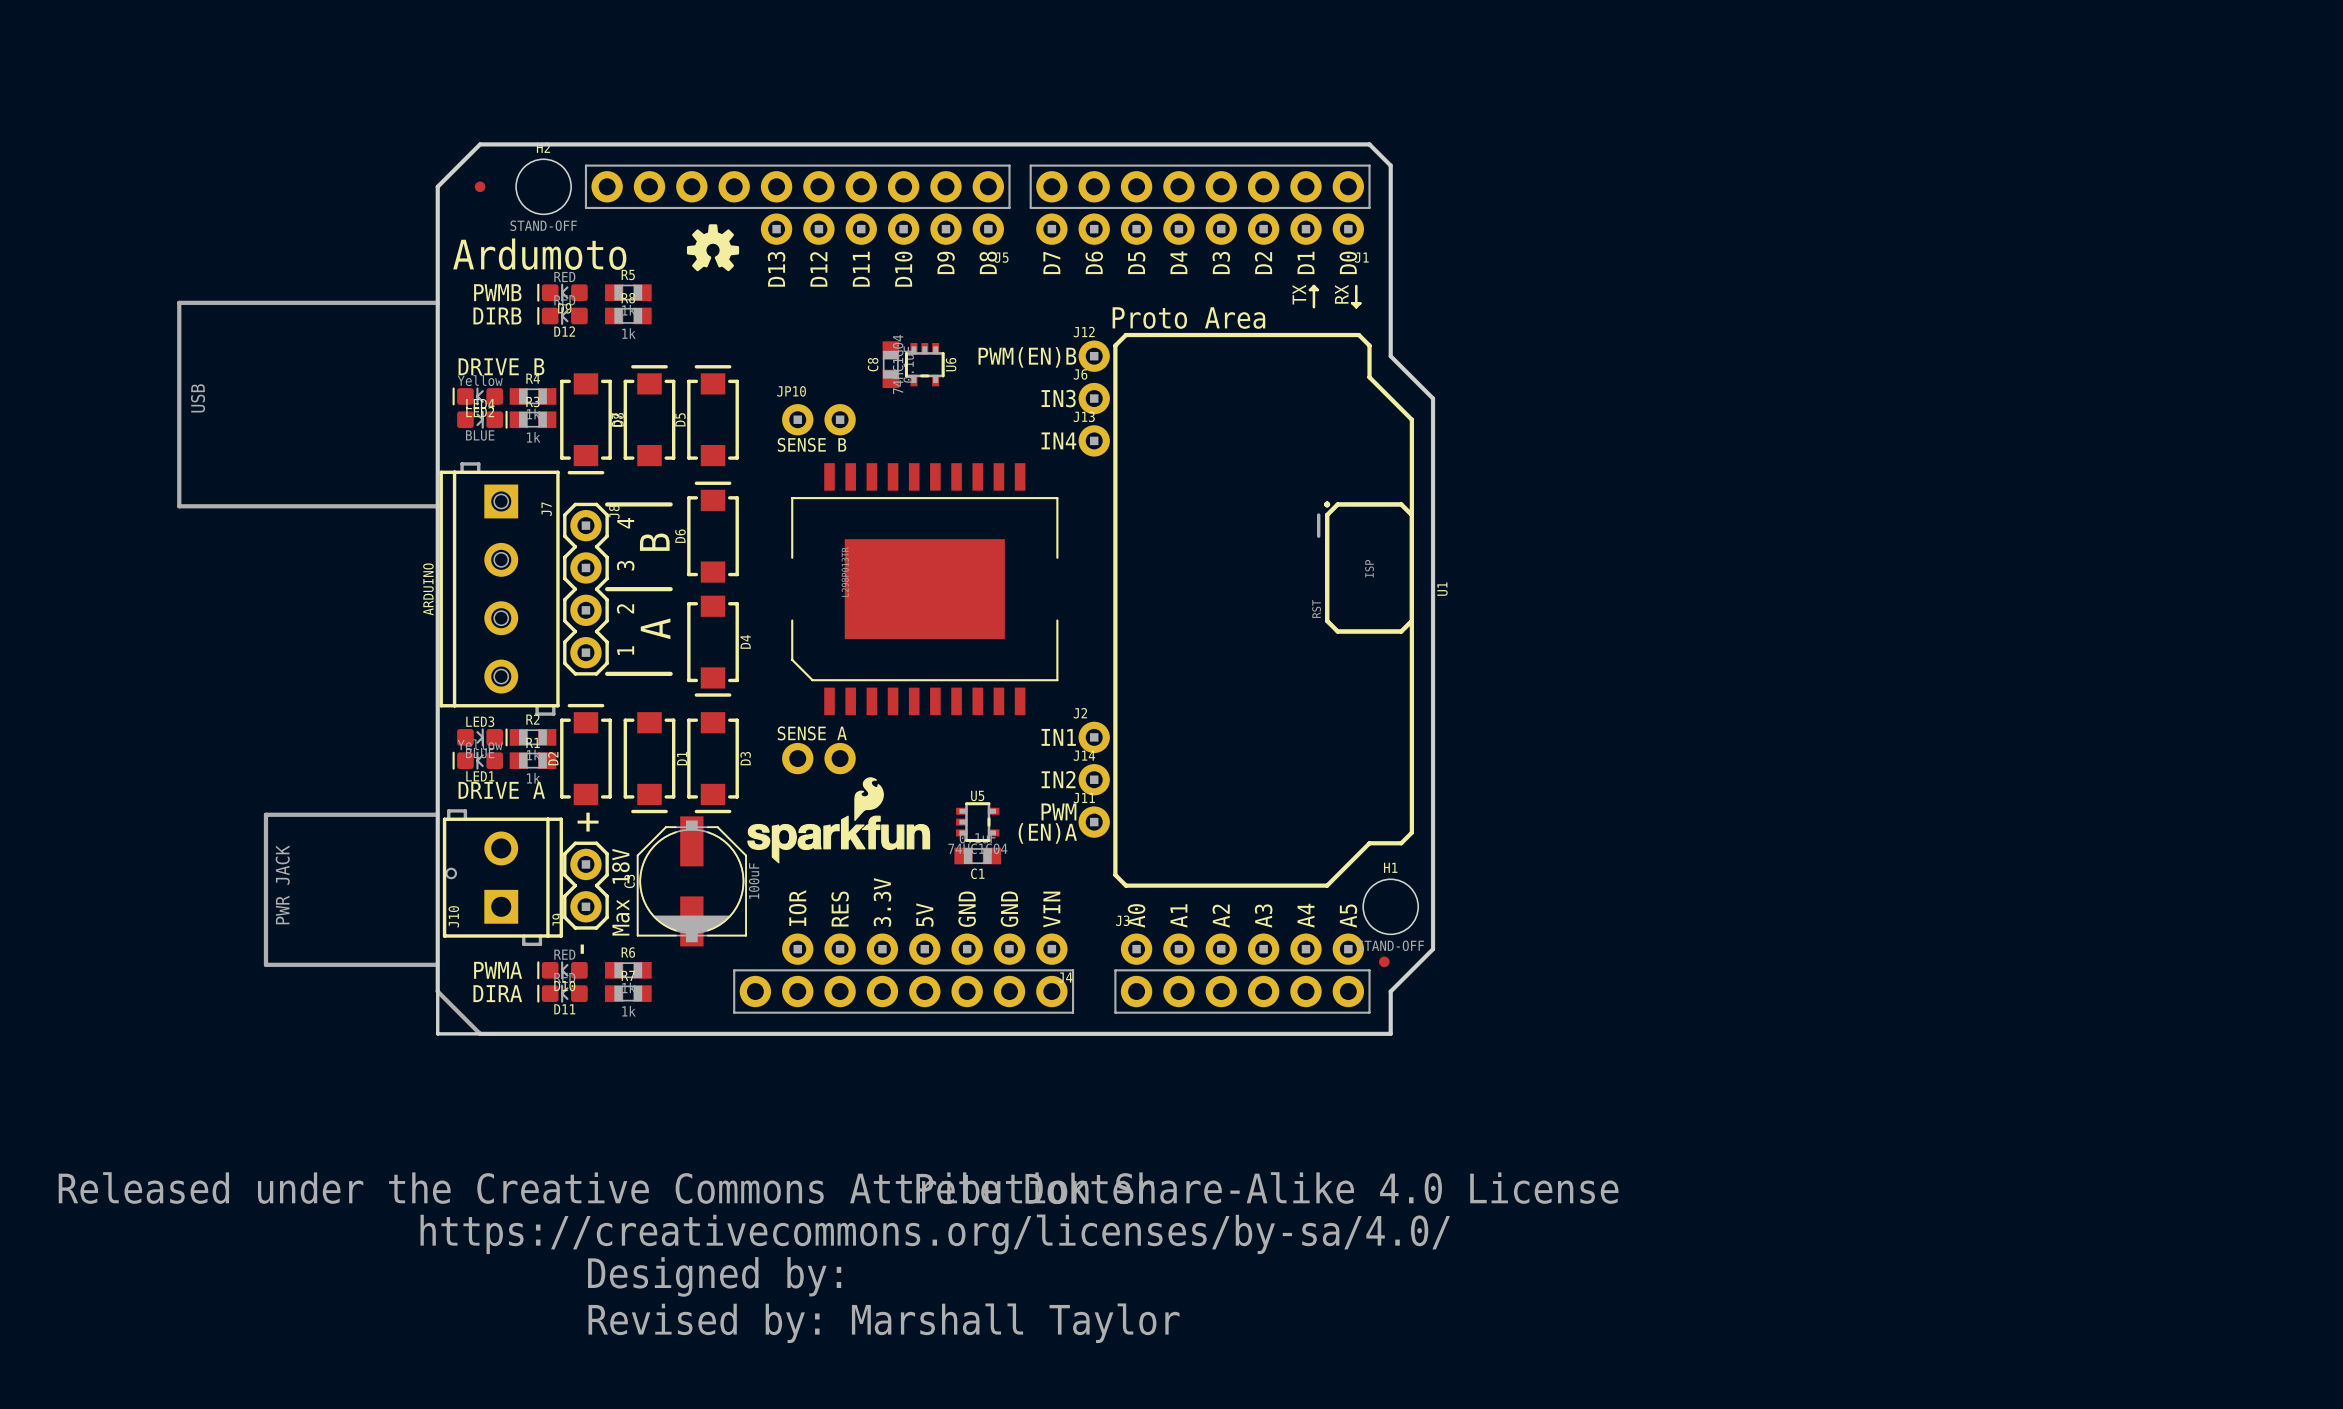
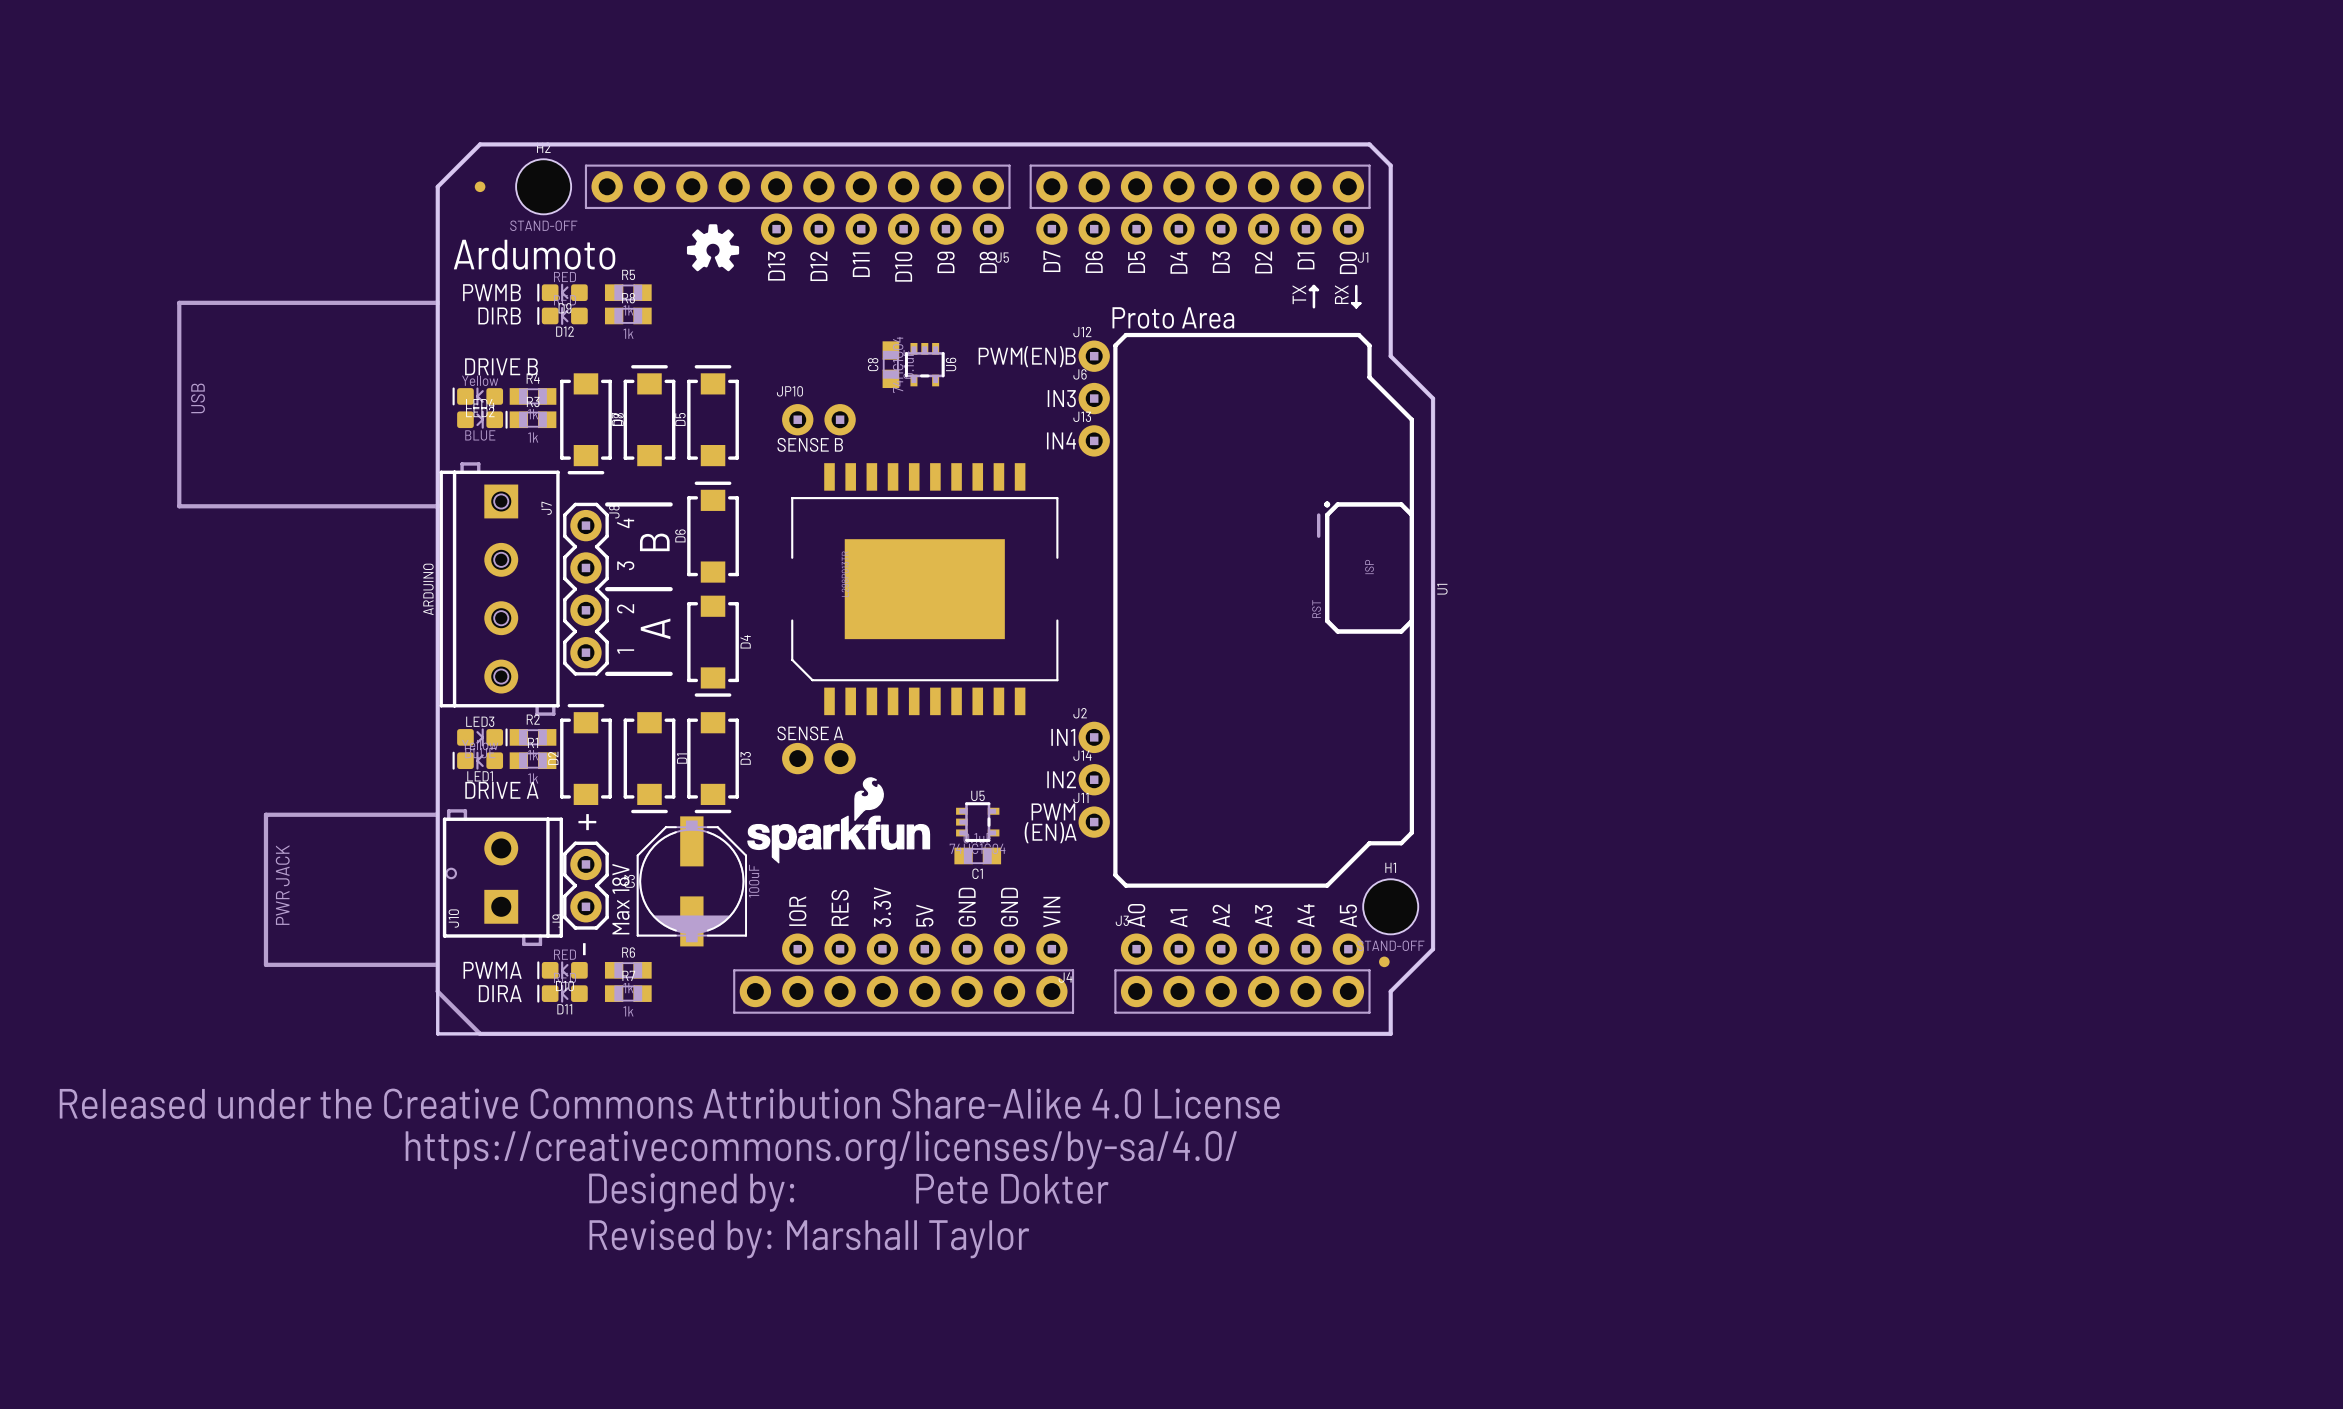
drawing position: (838, 1234) -> (669, 1150)
text position: Revised by: Marshall Taylor (884, 1323) -> Revised by: Marshall Taylor (809, 1239)

